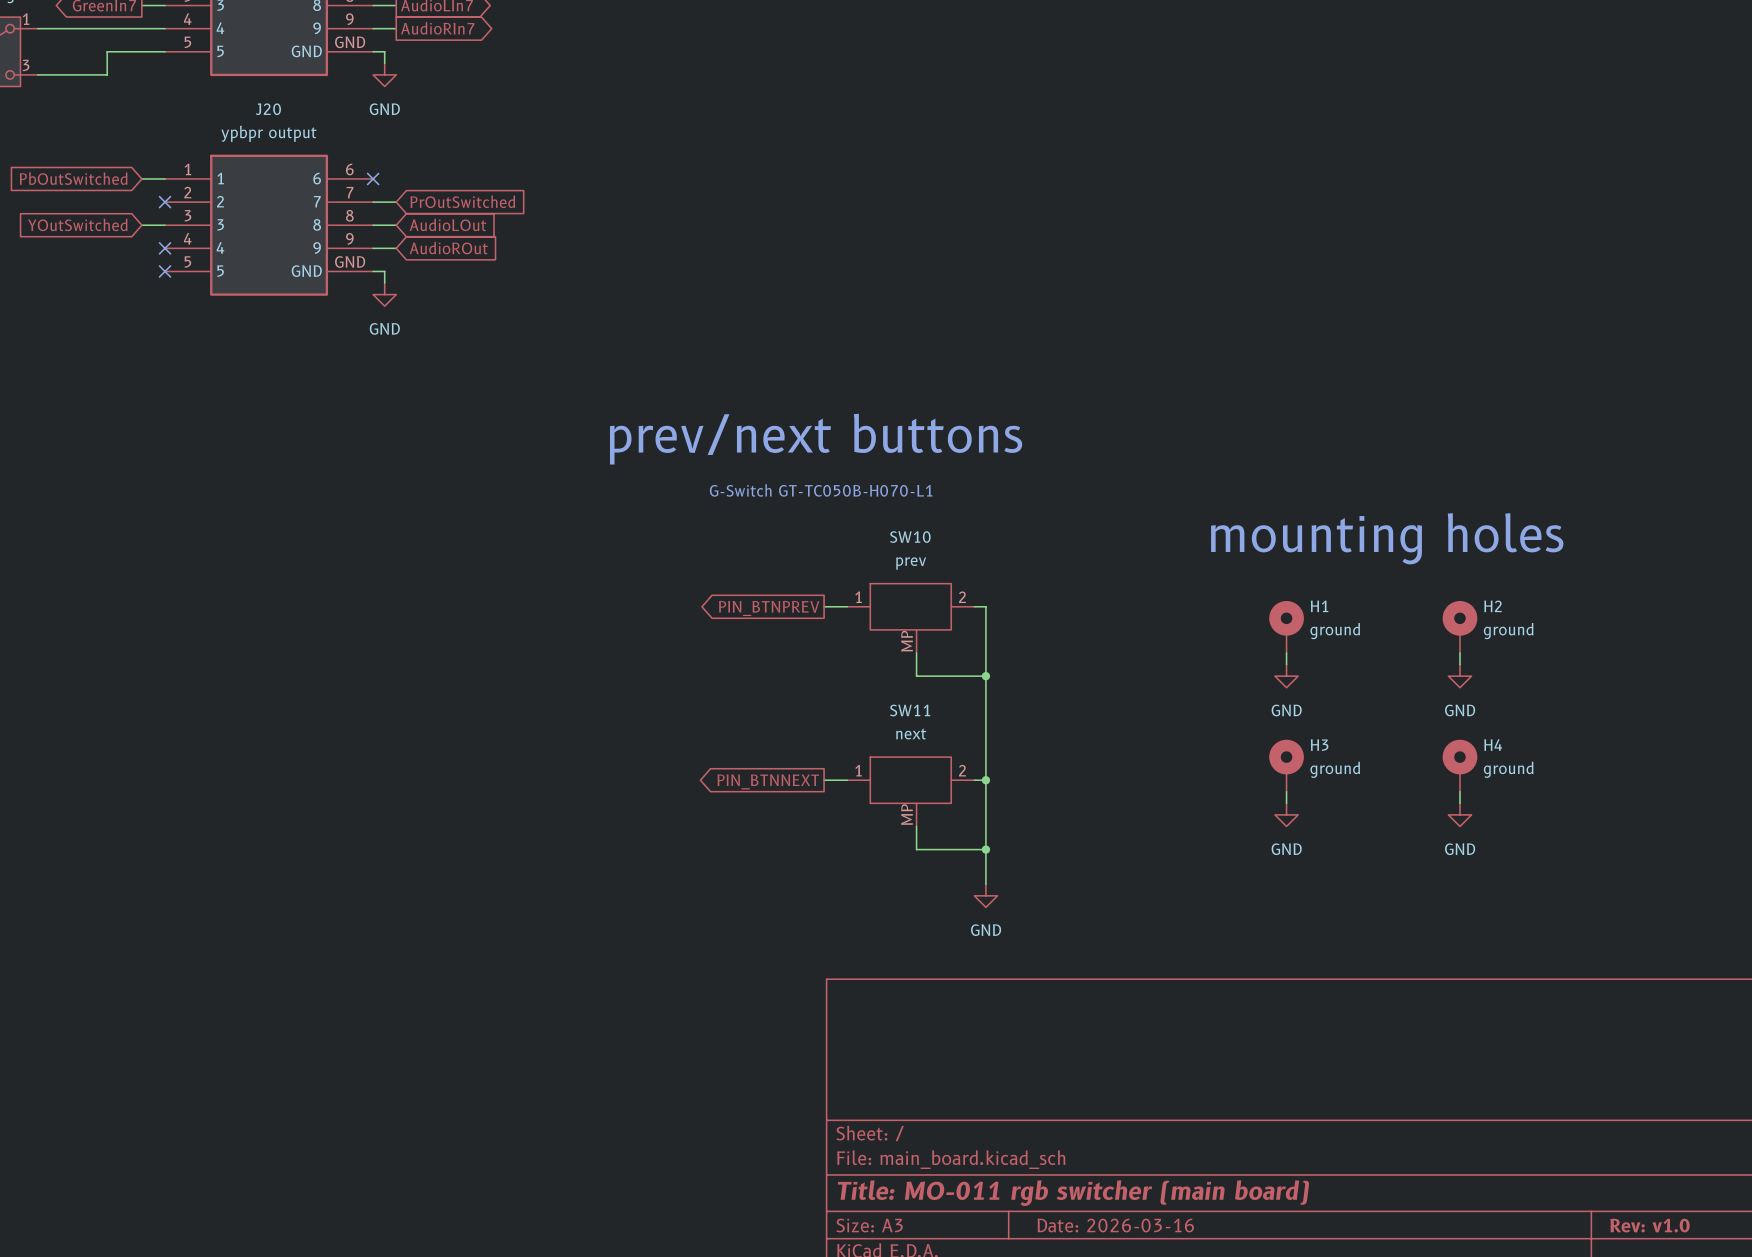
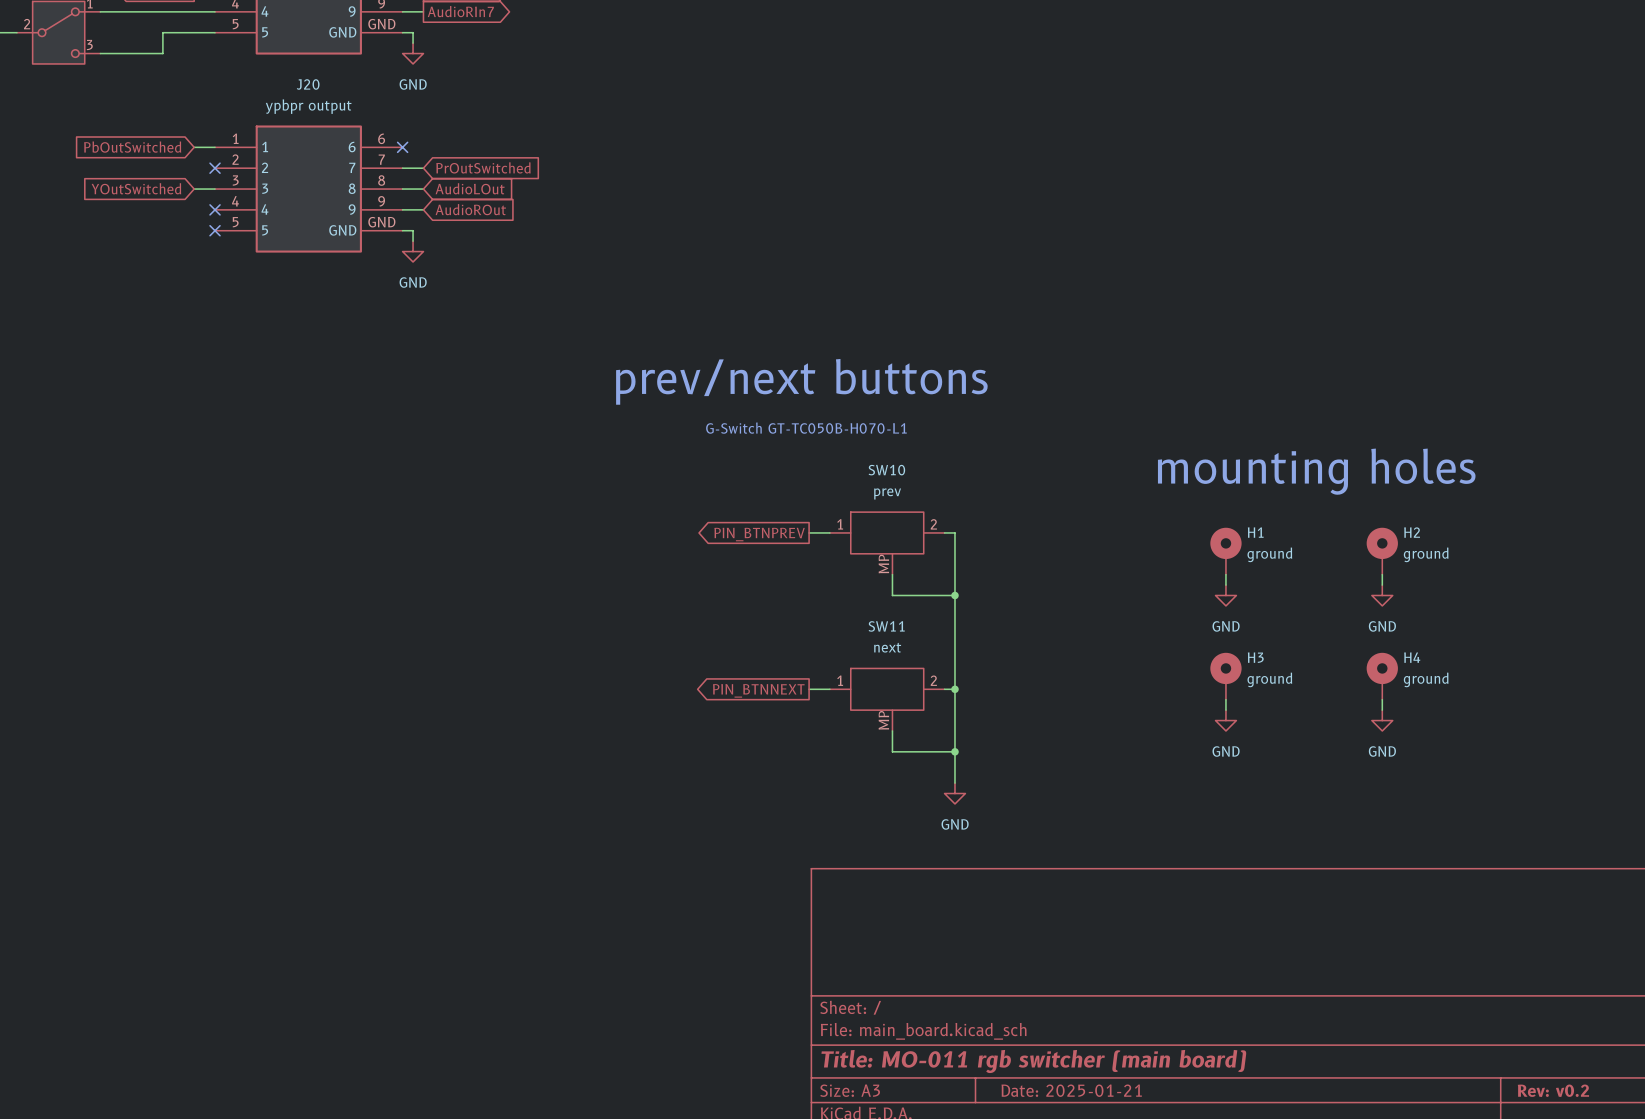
title block: Date: 2026-03-16 (1115, 1225) -> Date: 2025-01-21 (1071, 1090)
title block: Rev: v1.0 (1650, 1225) -> Rev: v0.2 (1553, 1090)

